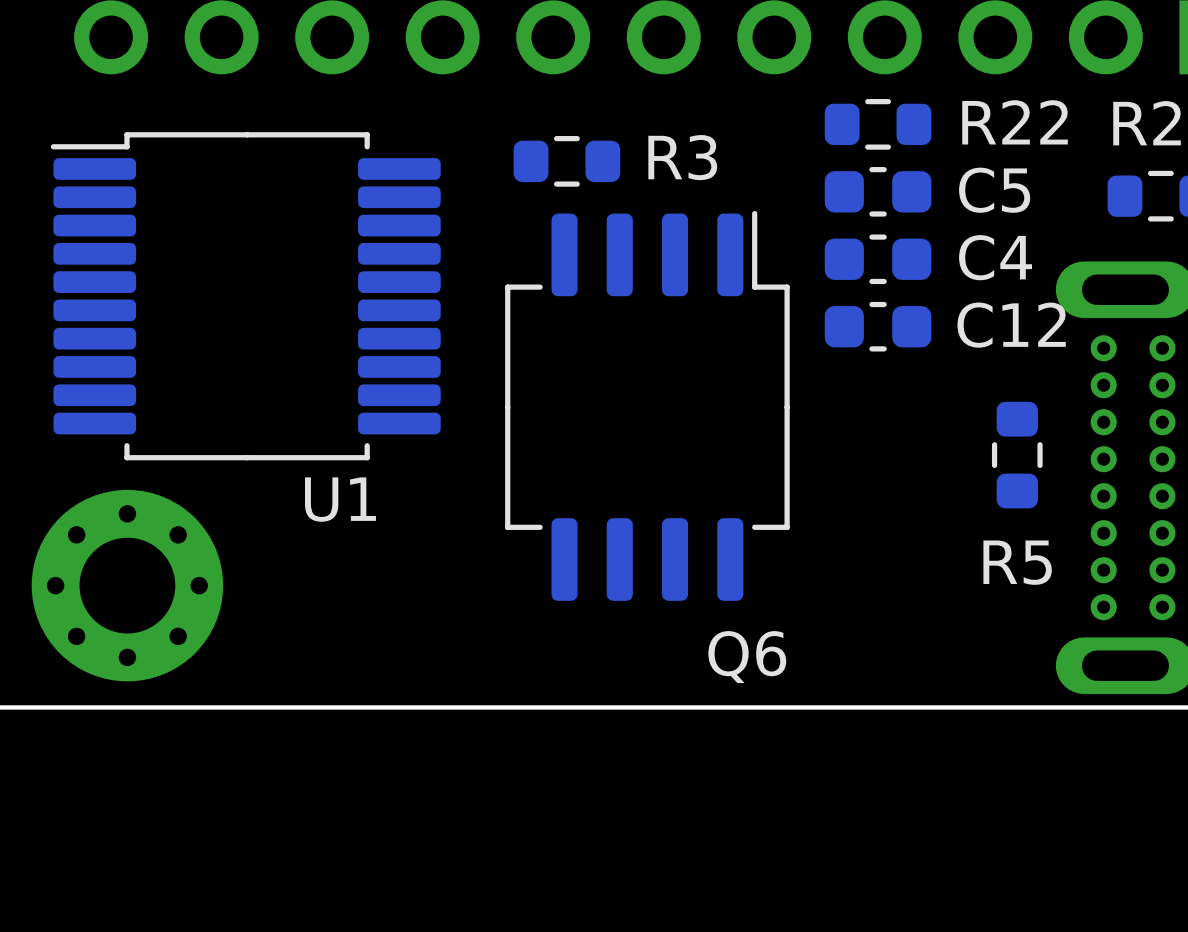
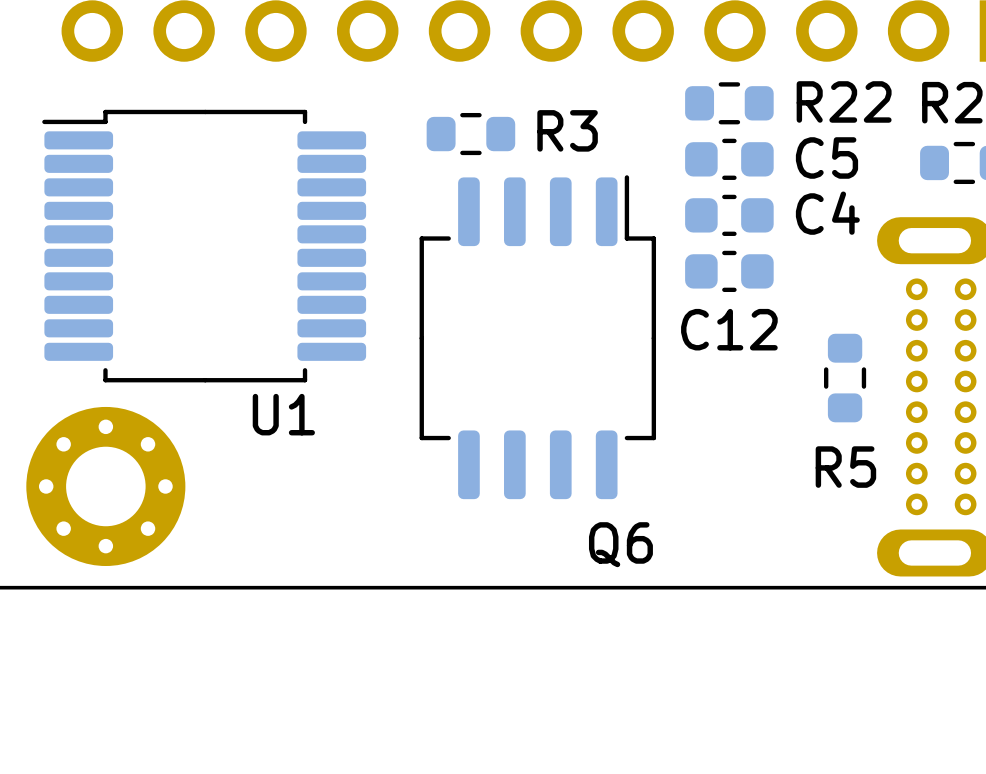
C12 name position: C12 (1011, 325) -> C12 (729, 329)

